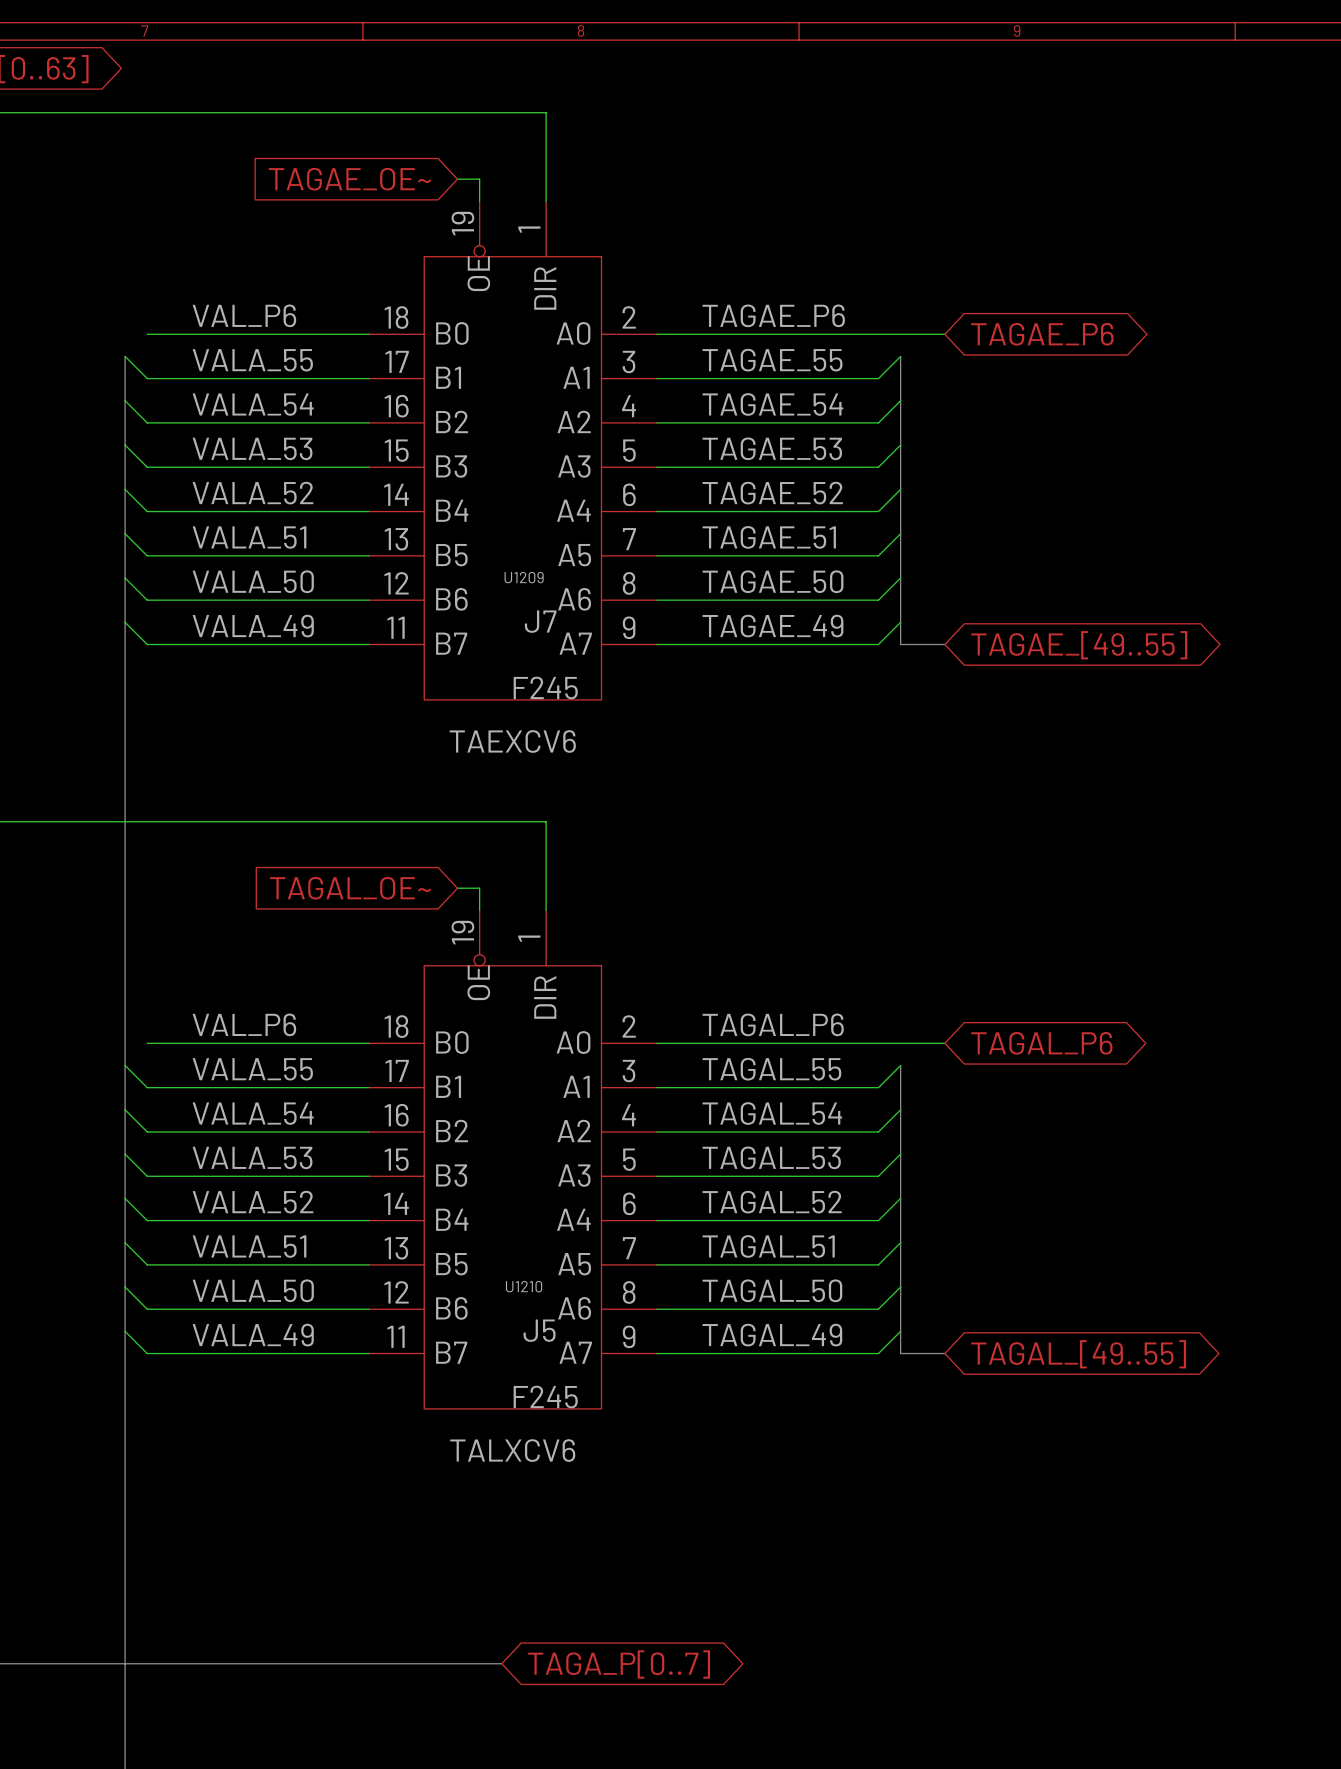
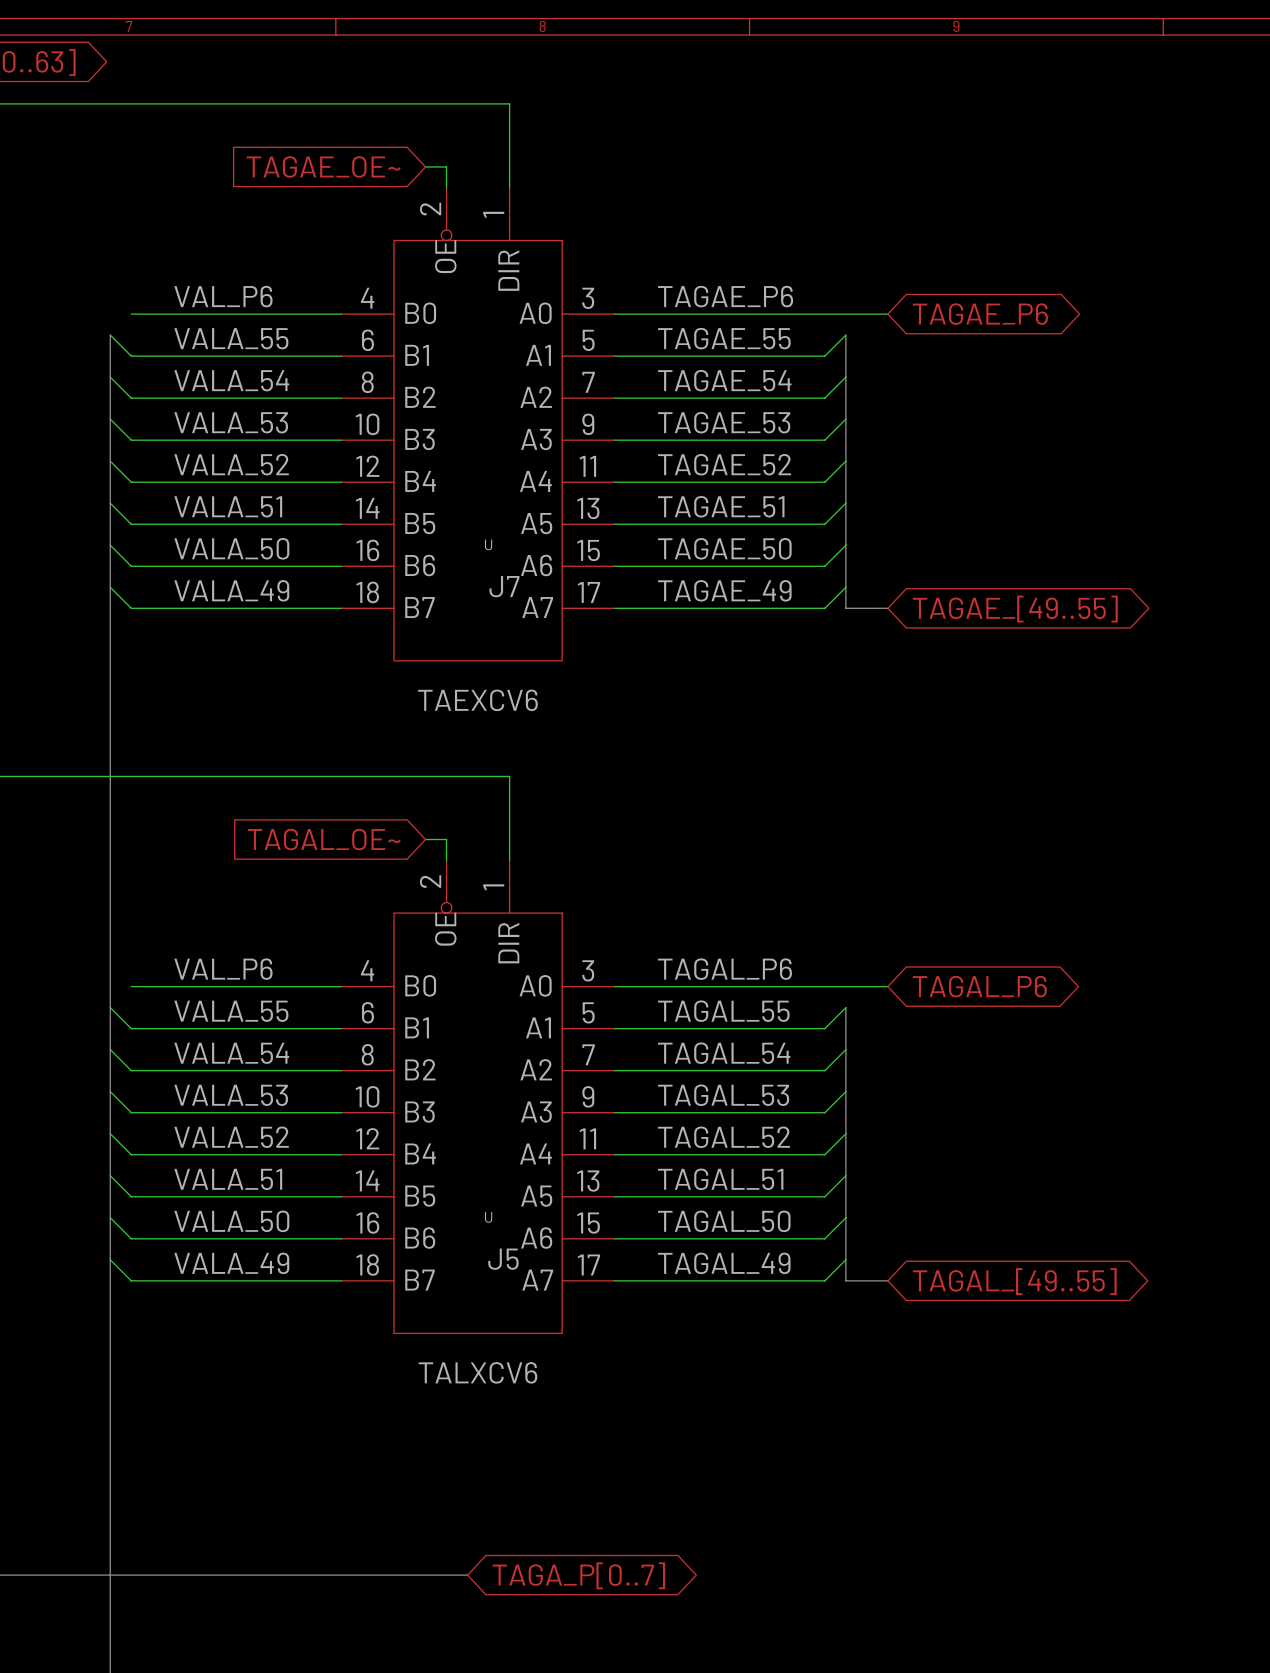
U1209 symbol: [368, 201, 657, 700] -> [341, 187, 615, 661]
U1209 name: U1209 (524, 577) -> U (488, 544)
U1209 value: F245 (545, 687) -> none
U1210 symbol: [368, 910, 657, 1409] -> [341, 860, 615, 1334]
U1210 name: U1210 (524, 1286) -> U (488, 1217)
U1210 value: F245 (545, 1397) -> none

